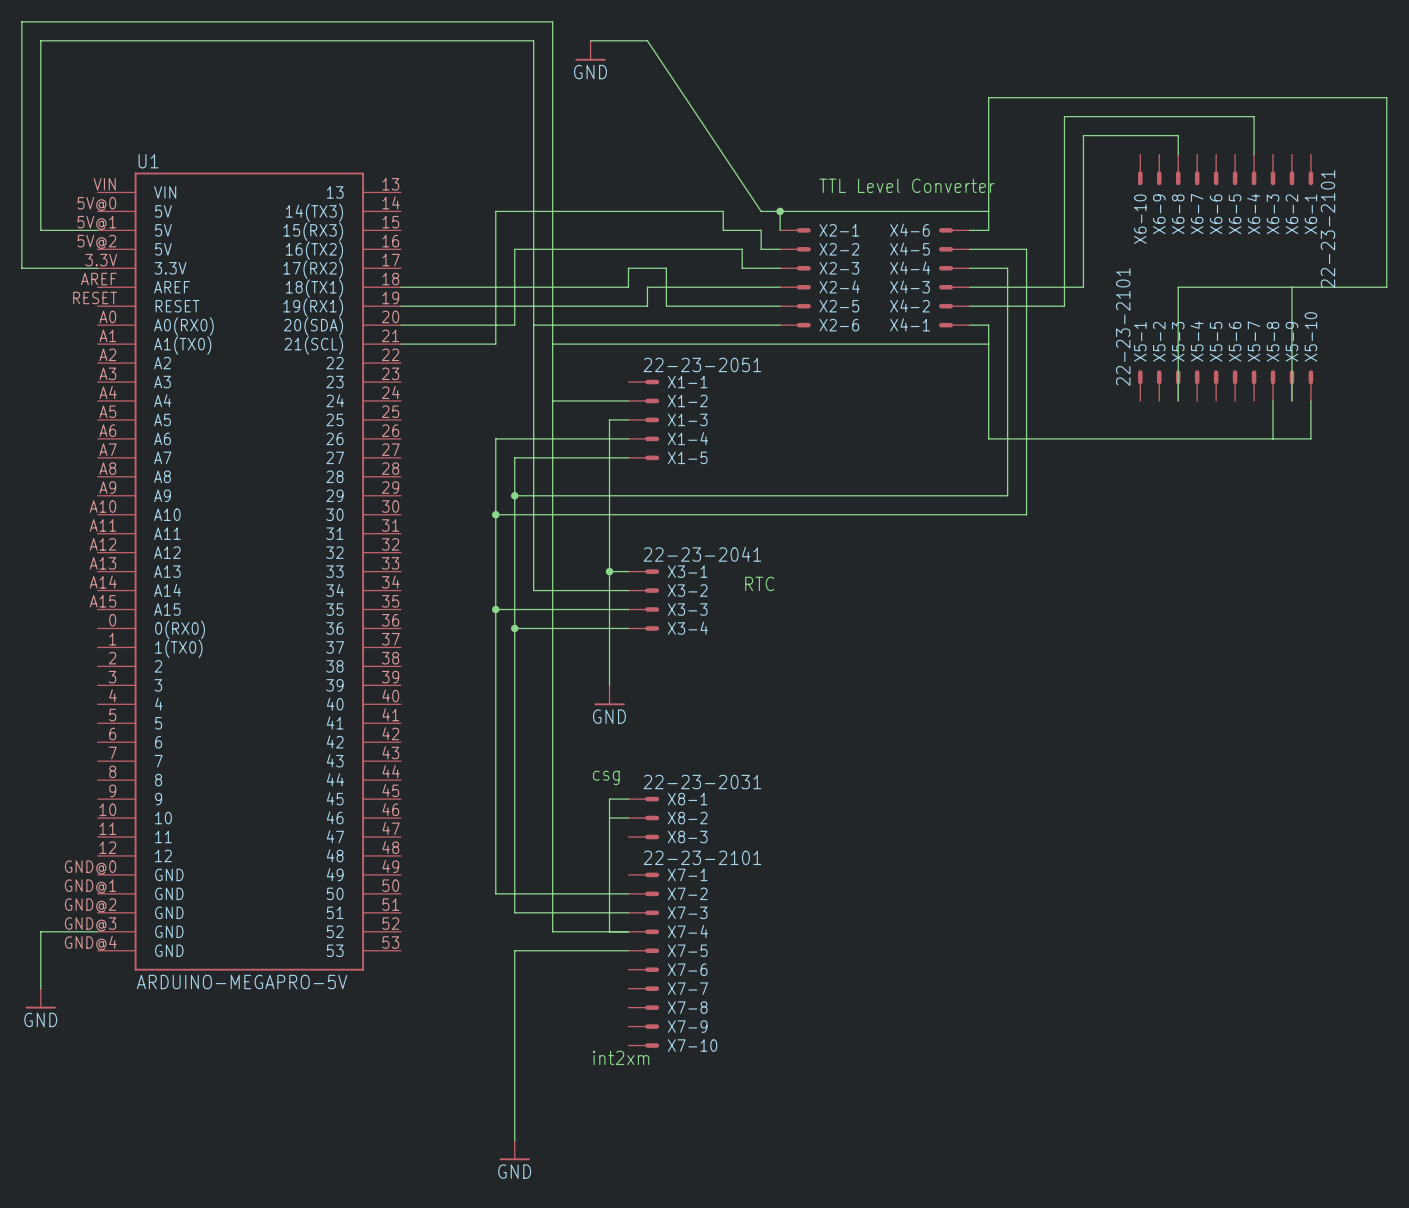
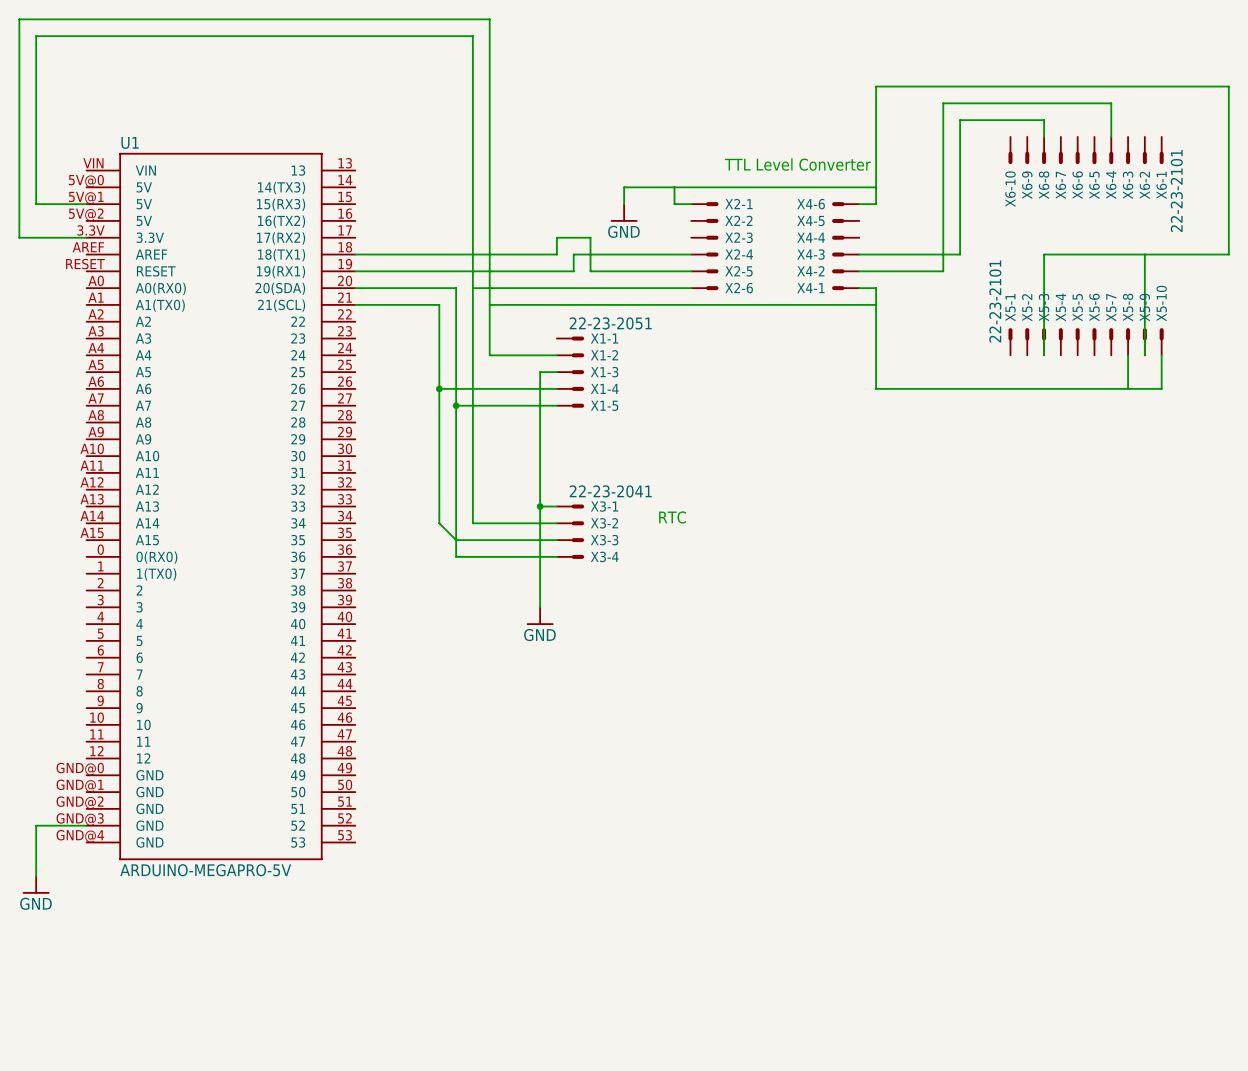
wire: (590, 40) (647, 40) (761, 211) -> none
power symbol: GND (590, 50) -> none
wire: (704, 211) (495, 211) (495, 344) -> (624, 187) (624, 204)
wire: (723, 211) (723, 230) (761, 230) (761, 249) (780, 249) -> (640, 187) (674, 187) (674, 204) (691, 204)
wire: (780, 211) (780, 230) -> none
junction: (780, 211) -> none
power symbol: none -> GND (624, 212)
wire: (969, 249) (1026, 249) (1026, 514) (495, 514) -> none
wire: (780, 268) (742, 268) (742, 249) (514, 249) (514, 325) -> (456, 405) (456, 288)
wire: (969, 268) (1007, 268) (1007, 495) (514, 495) -> none
wire: none -> (439, 304) (439, 388)
wire: (552, 400) (552, 931) (628, 931) -> none
junction: none -> (439, 388)
junction: none -> (456, 405)
junction: (514, 495) -> none
junction: (495, 514) -> none
wire: (495, 590) (495, 893) (628, 893) -> none
wire: (495, 609) (514, 609) -> (439, 523) (456, 540)
junction: (495, 609) -> none
wire: (514, 628) (514, 912) (628, 912) -> none
junction: (514, 628) -> none
text: csg (606, 777) -> none
wire: (628, 799) (609, 799) (609, 931) -> none
X8-1: 22-23-2031 (643, 799) -> none
wire: (609, 818) (628, 818) -> none
X8-2: (643, 818) -> none
X8-3: (643, 837) -> none
X7-1: 22-23-2101 (643, 874) -> none
X7-2: (643, 893) -> none
X7-3: (643, 912) -> none
X7-4: (643, 931) -> none
wire: (628, 950) (514, 950) (514, 1140) -> none
X7-5: (643, 950) -> none
X7-6: (643, 969) -> none
X7-7: (643, 988) -> none
X7-8: (643, 1007) -> none
X7-9: (643, 1026) -> none
X7-10: (643, 1045) -> none
text: int2xm (621, 1057) -> none
power symbol: GND (514, 1150) -> none

